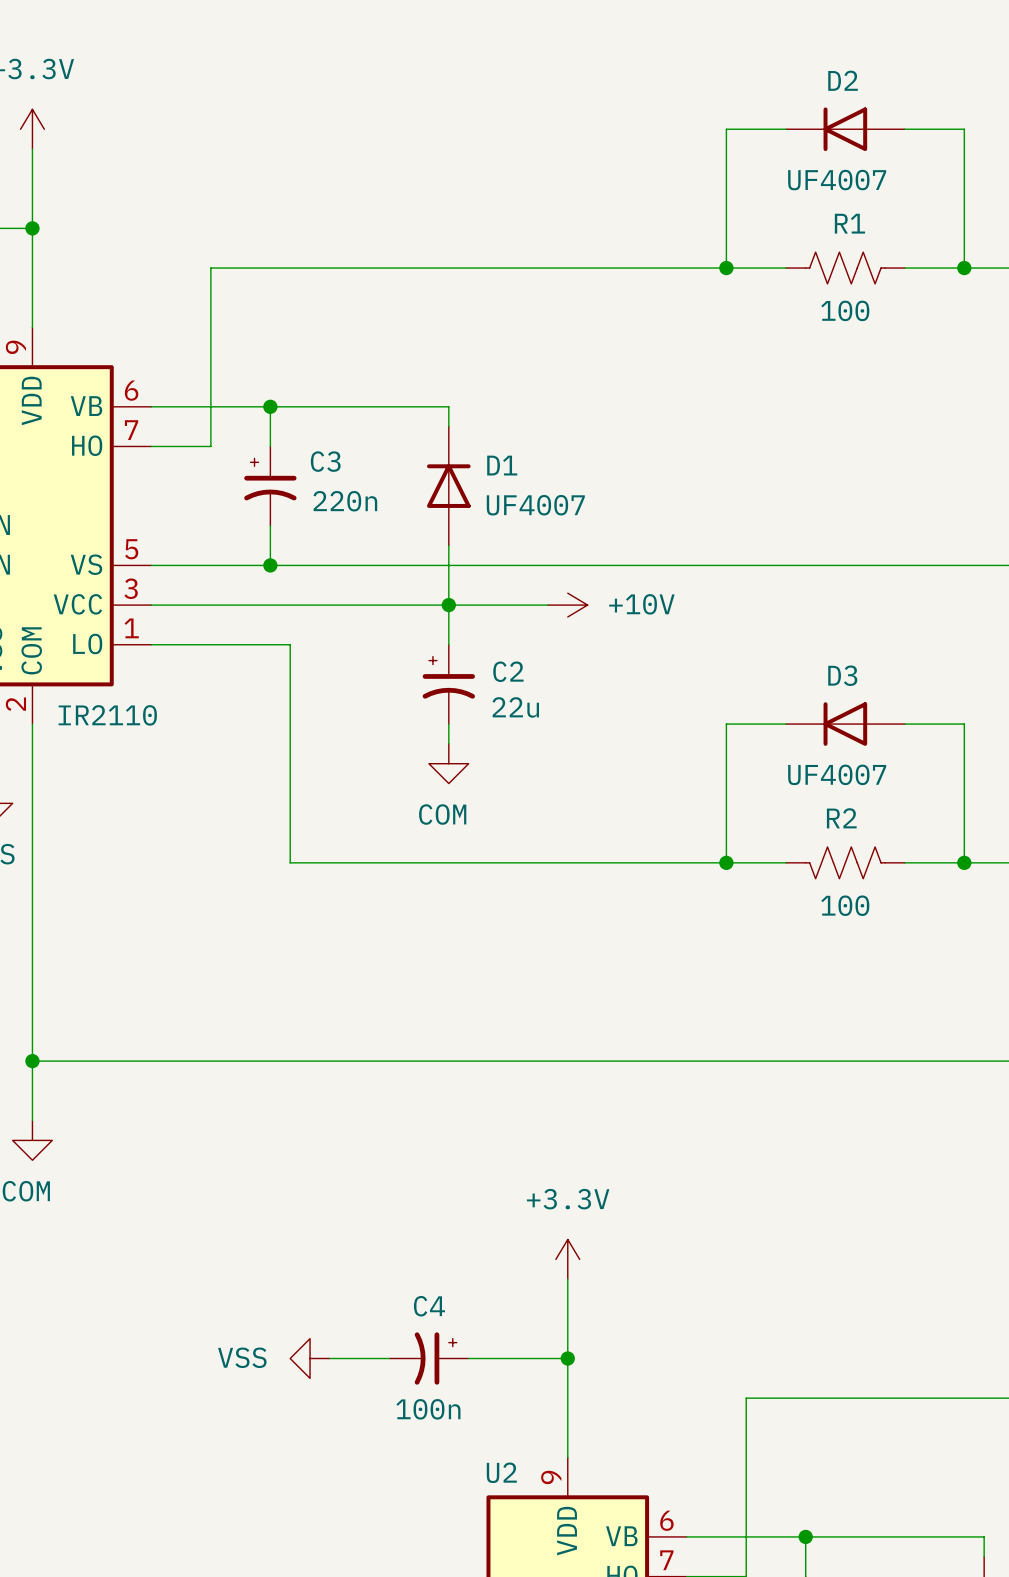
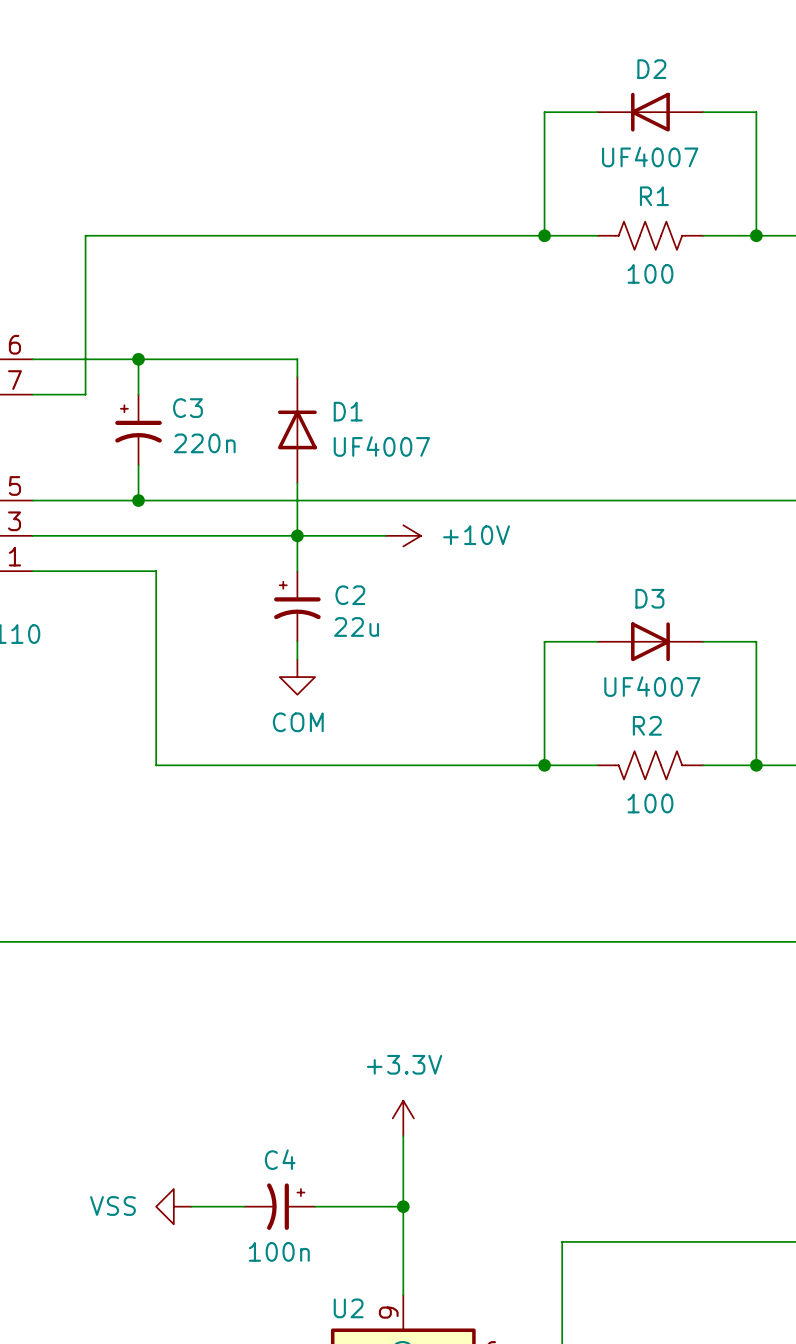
D3 rotation: 0° (845, 724) -> 180° (650, 641)

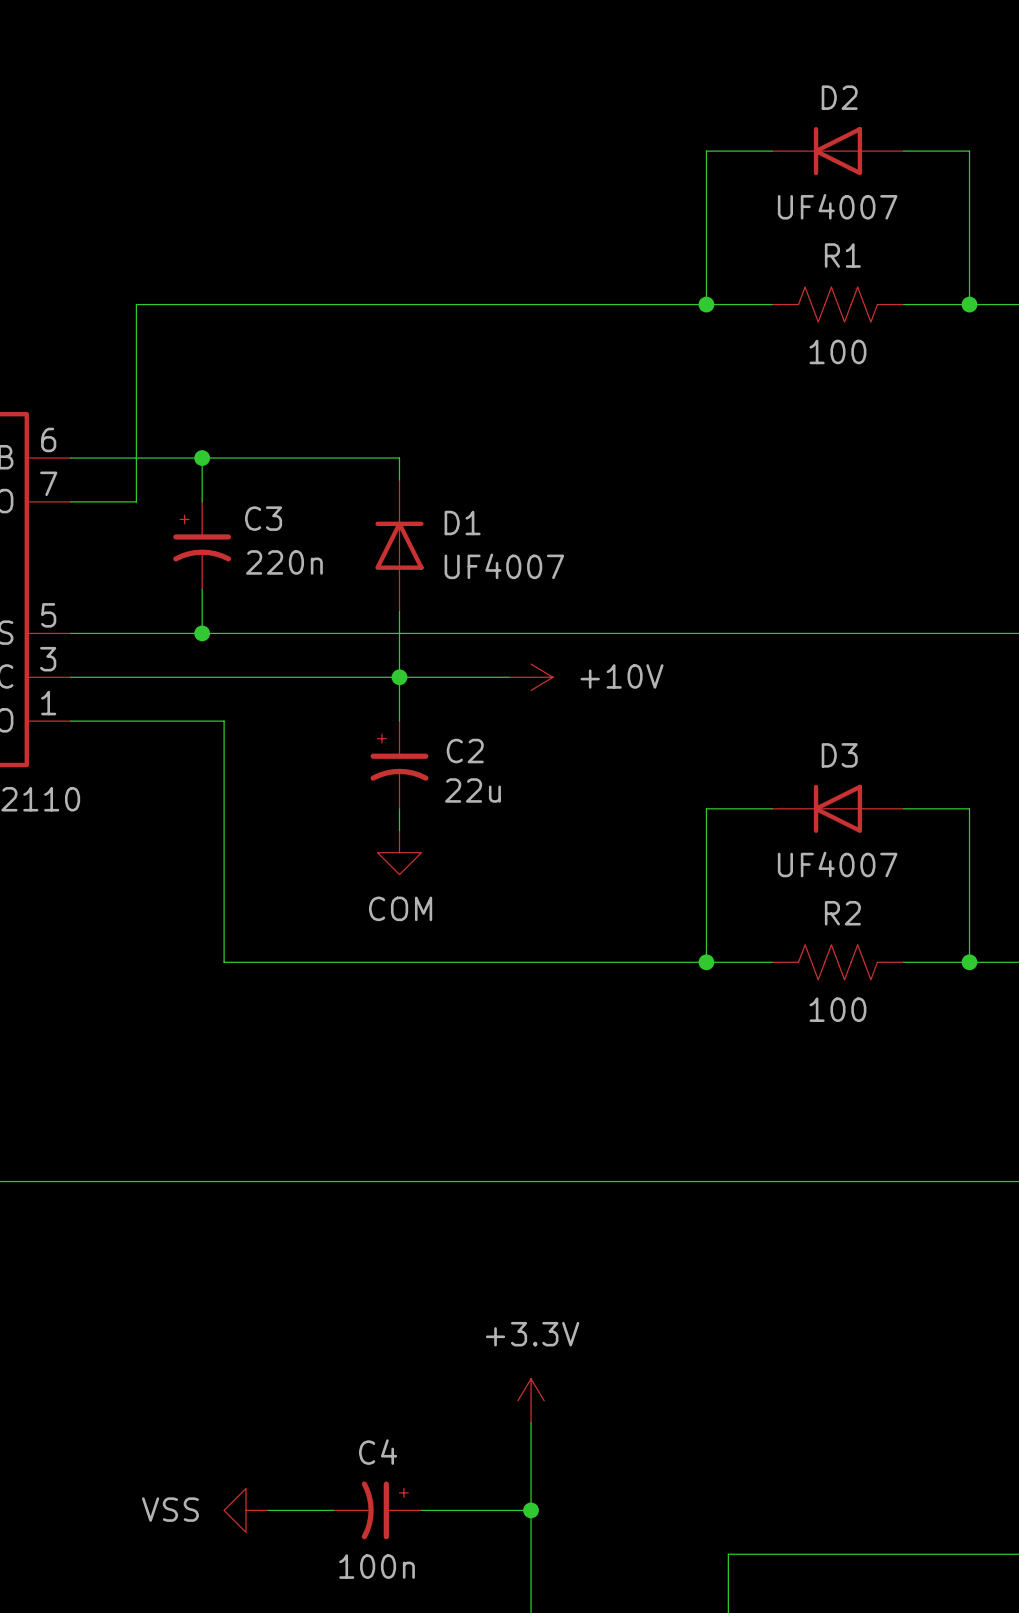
D3 rotation: 0° (650, 641) -> 180° (837, 808)
R2 flip: as is (650, 765) -> left-right (837, 962)

